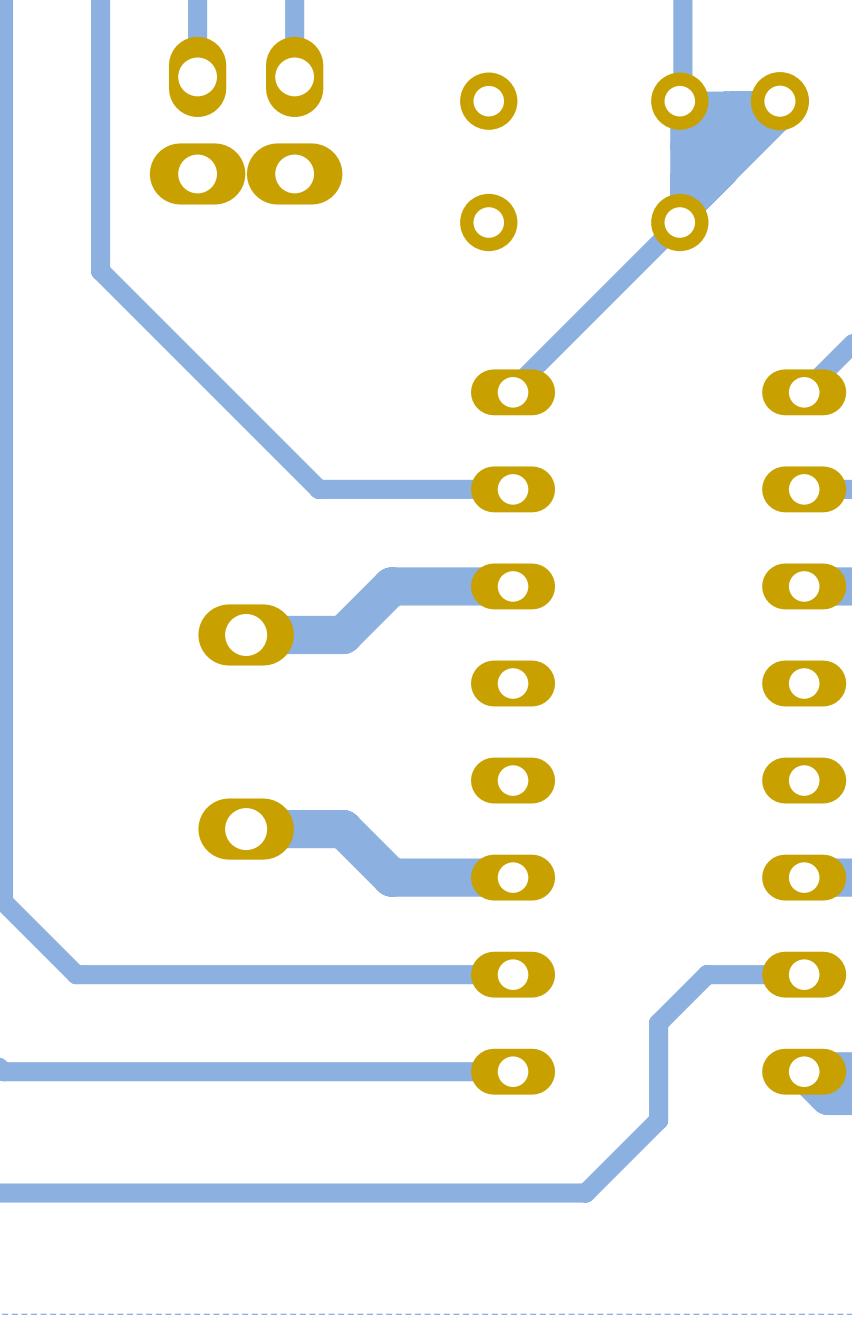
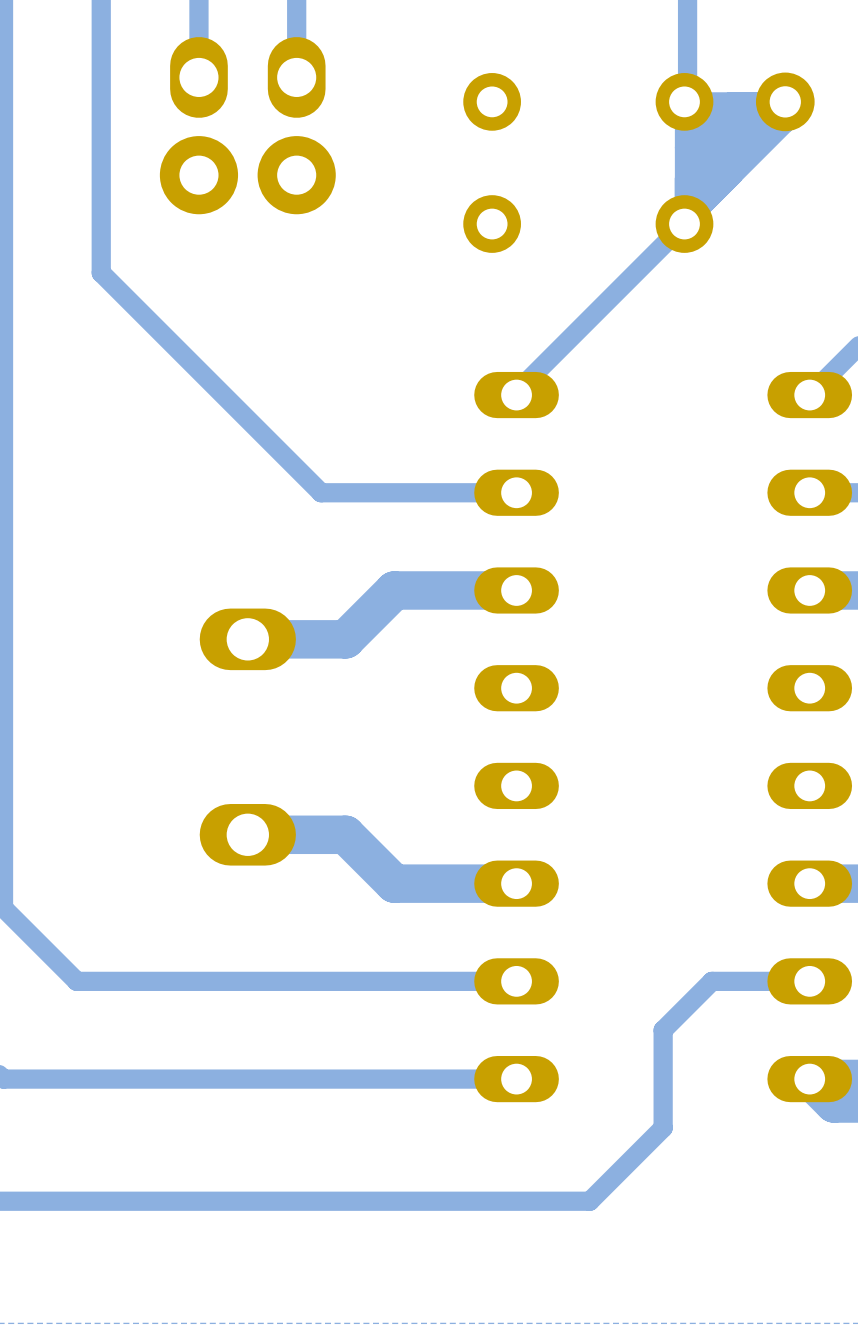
part footprint: [149, 36, 246, 205] -> [159, 37, 239, 215]
part footprint: [246, 36, 343, 205] -> [257, 37, 336, 215]

